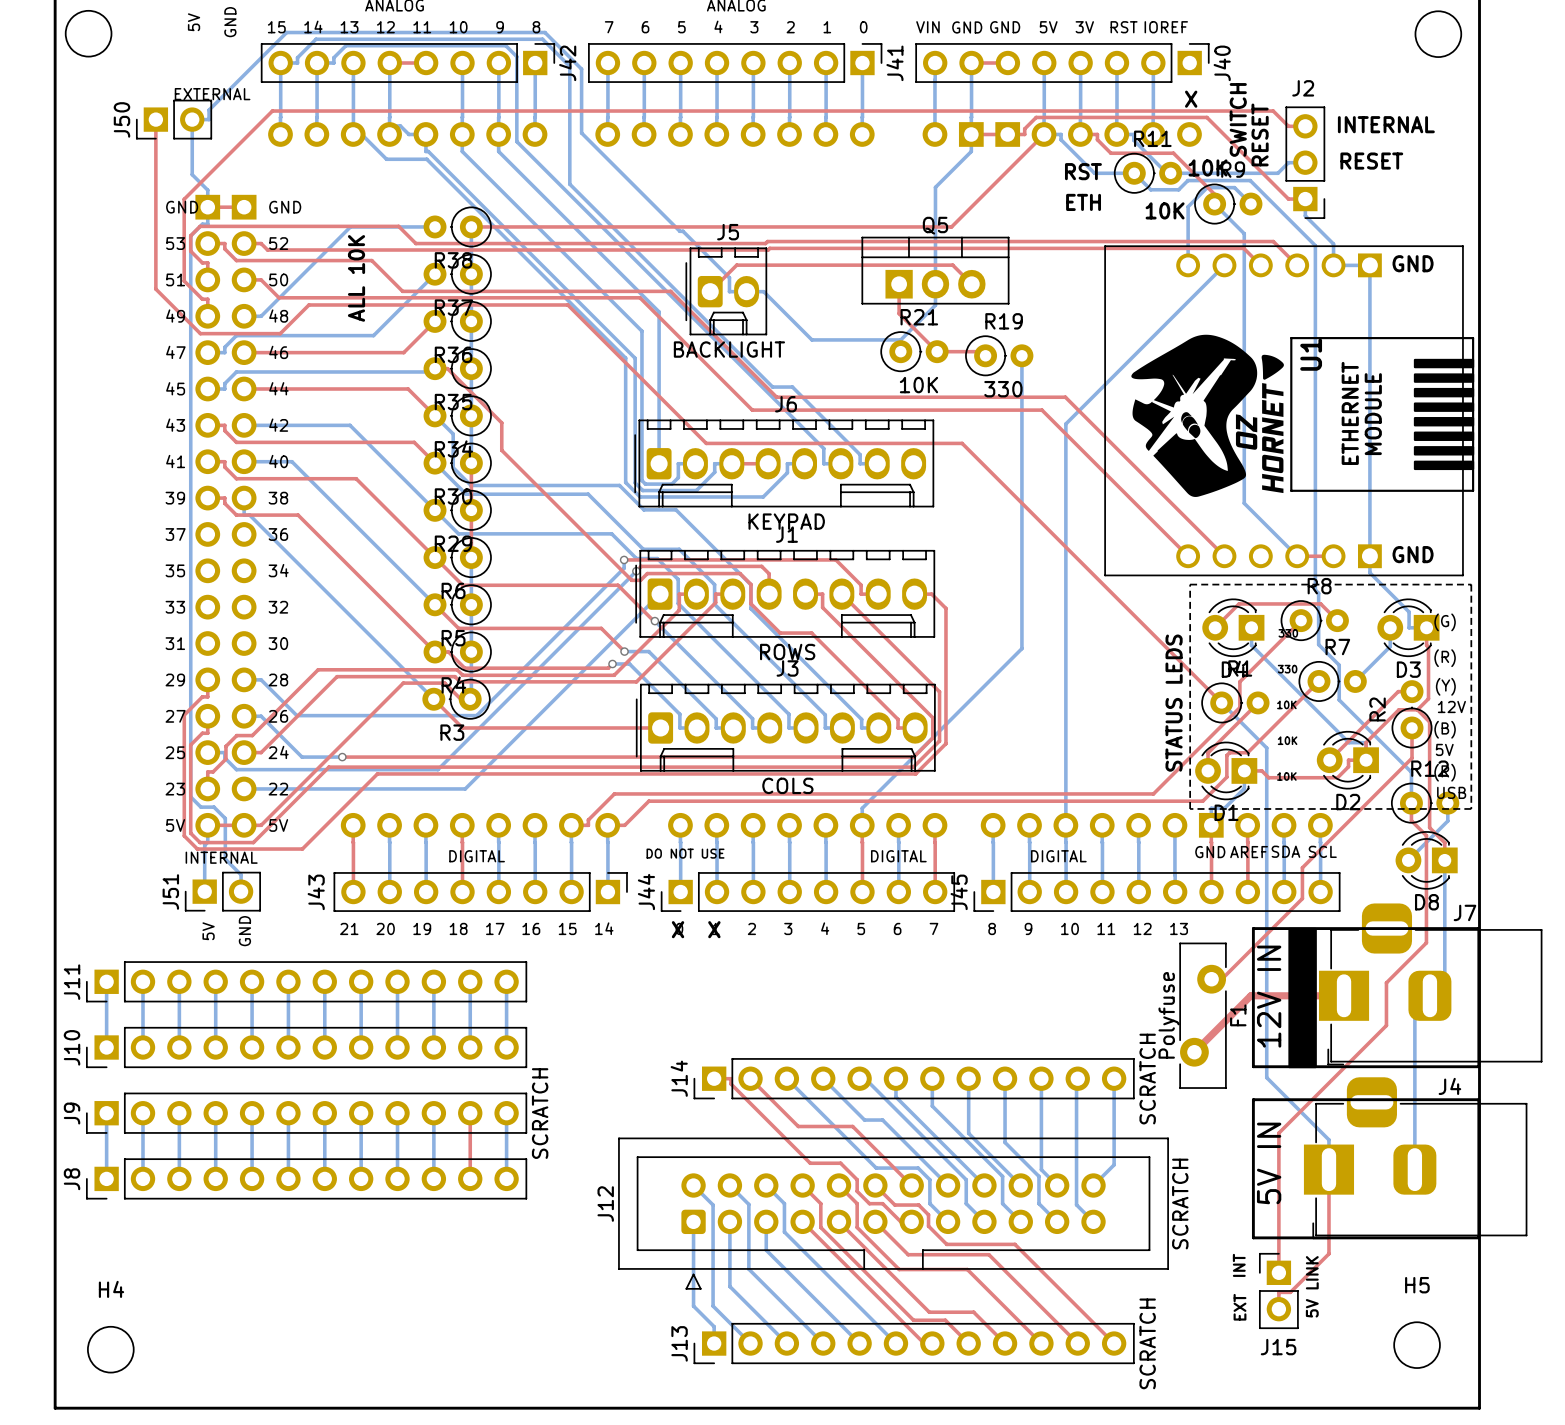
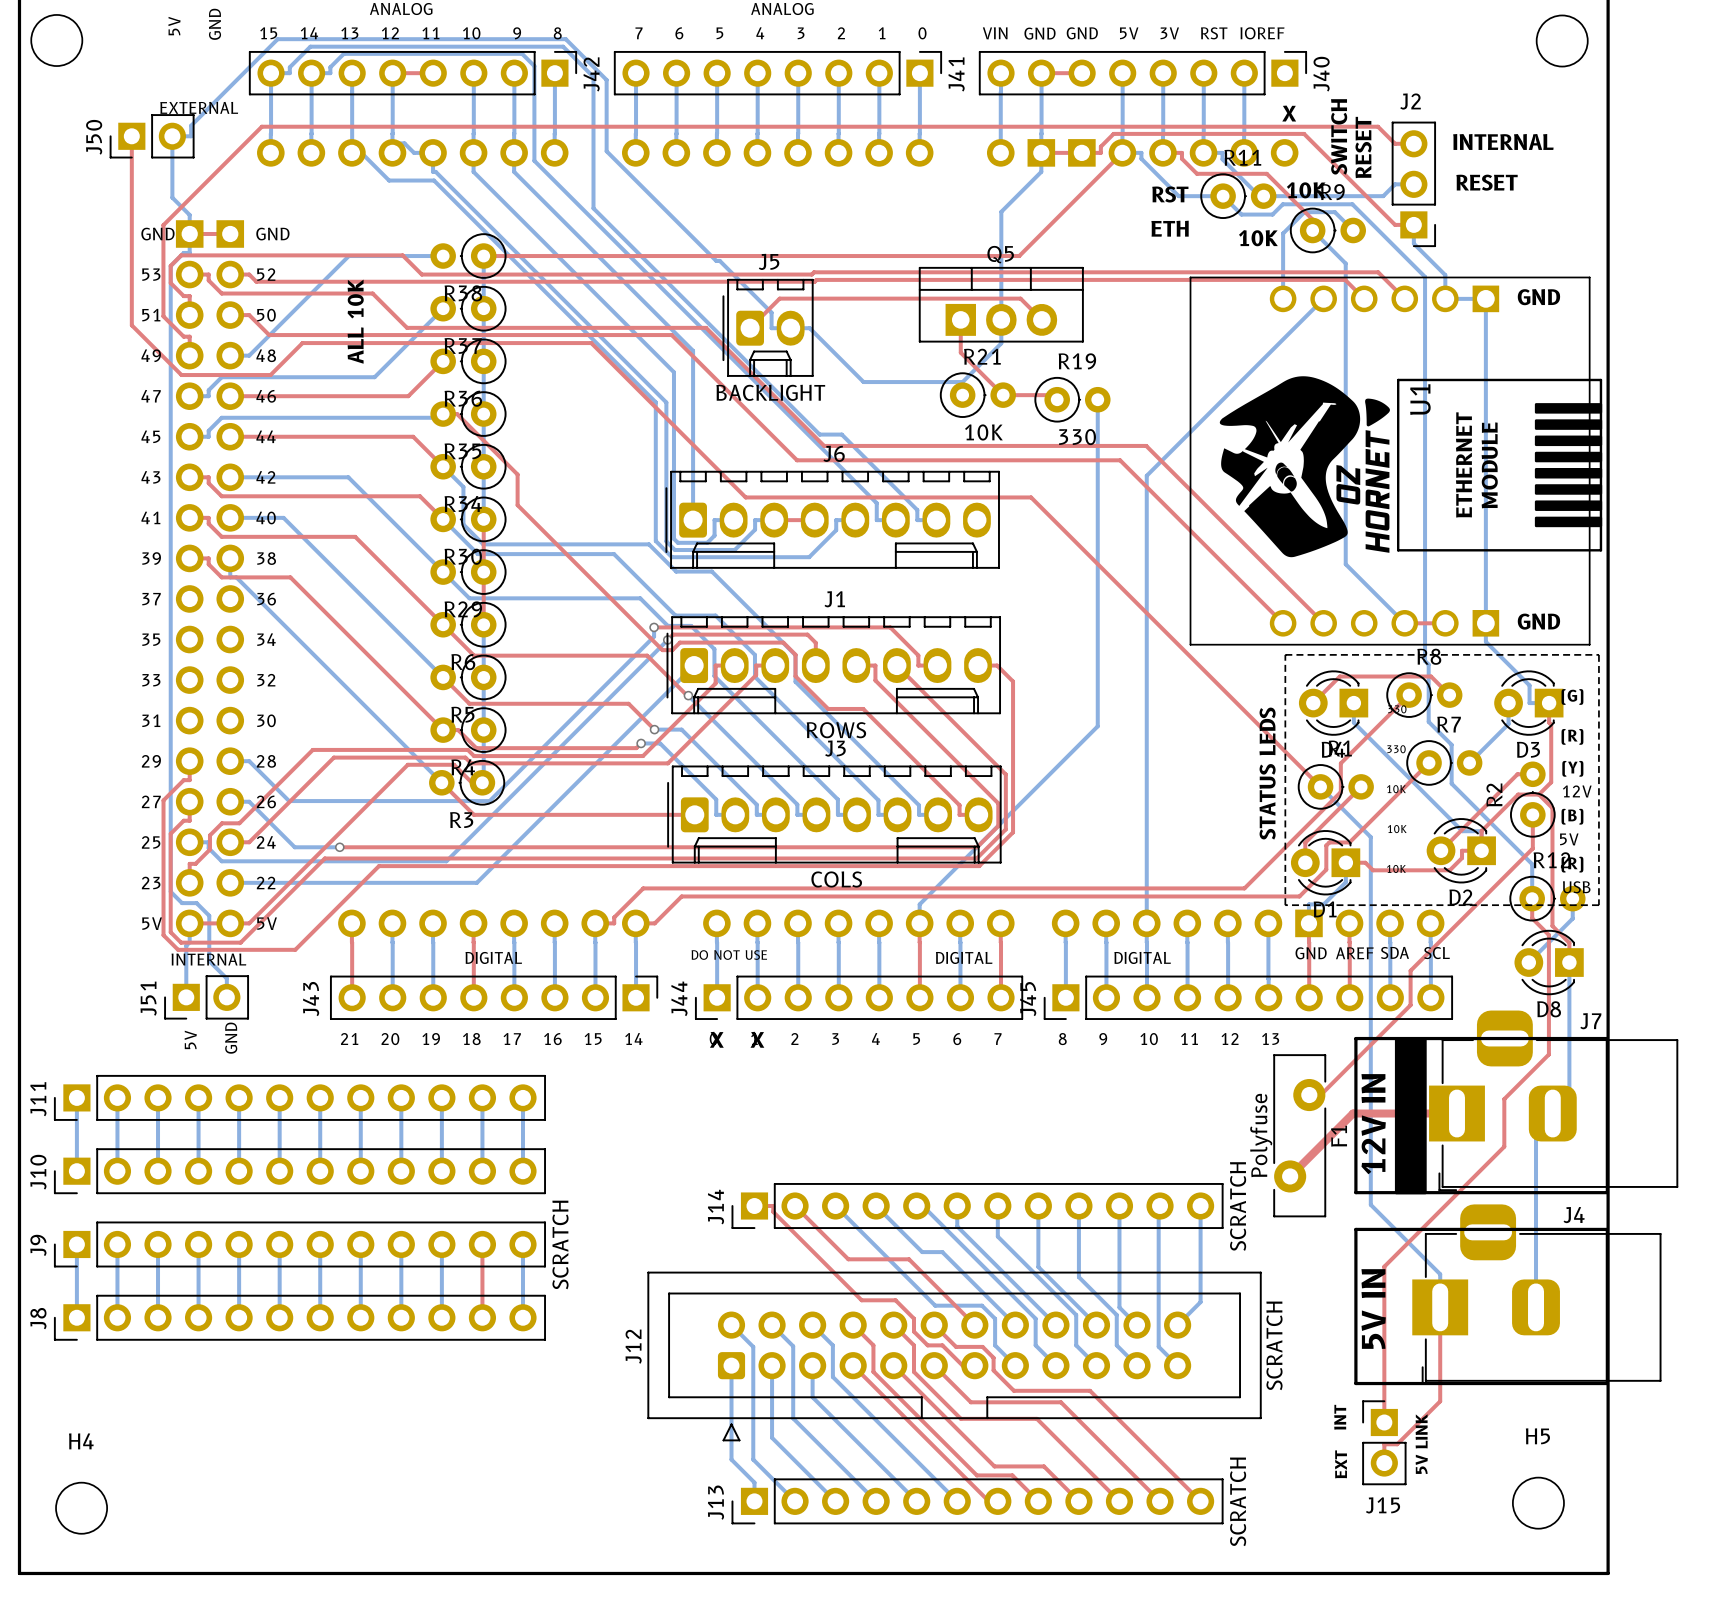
J6 value: KEYPAD (786, 521) -> none

